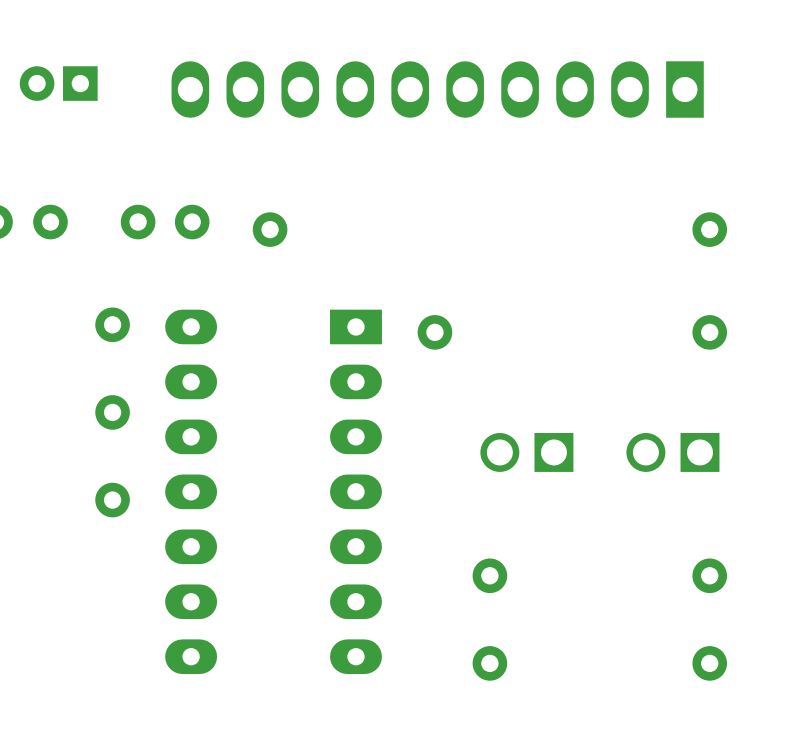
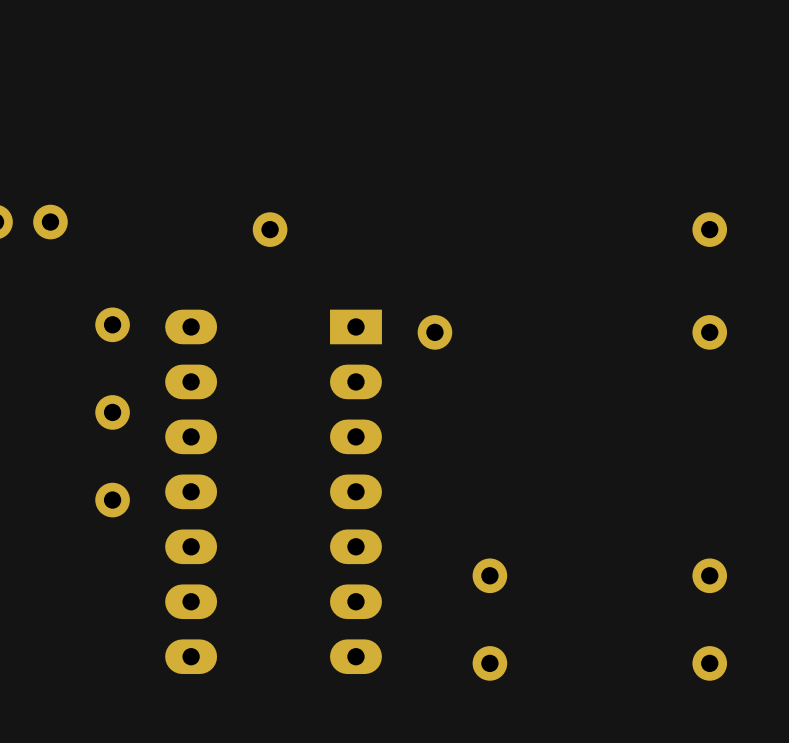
part: (58, 83) -> none
part: (437, 89) -> none
part: (165, 222) -> none
part: (526, 452) -> none
part: (672, 452) -> none

